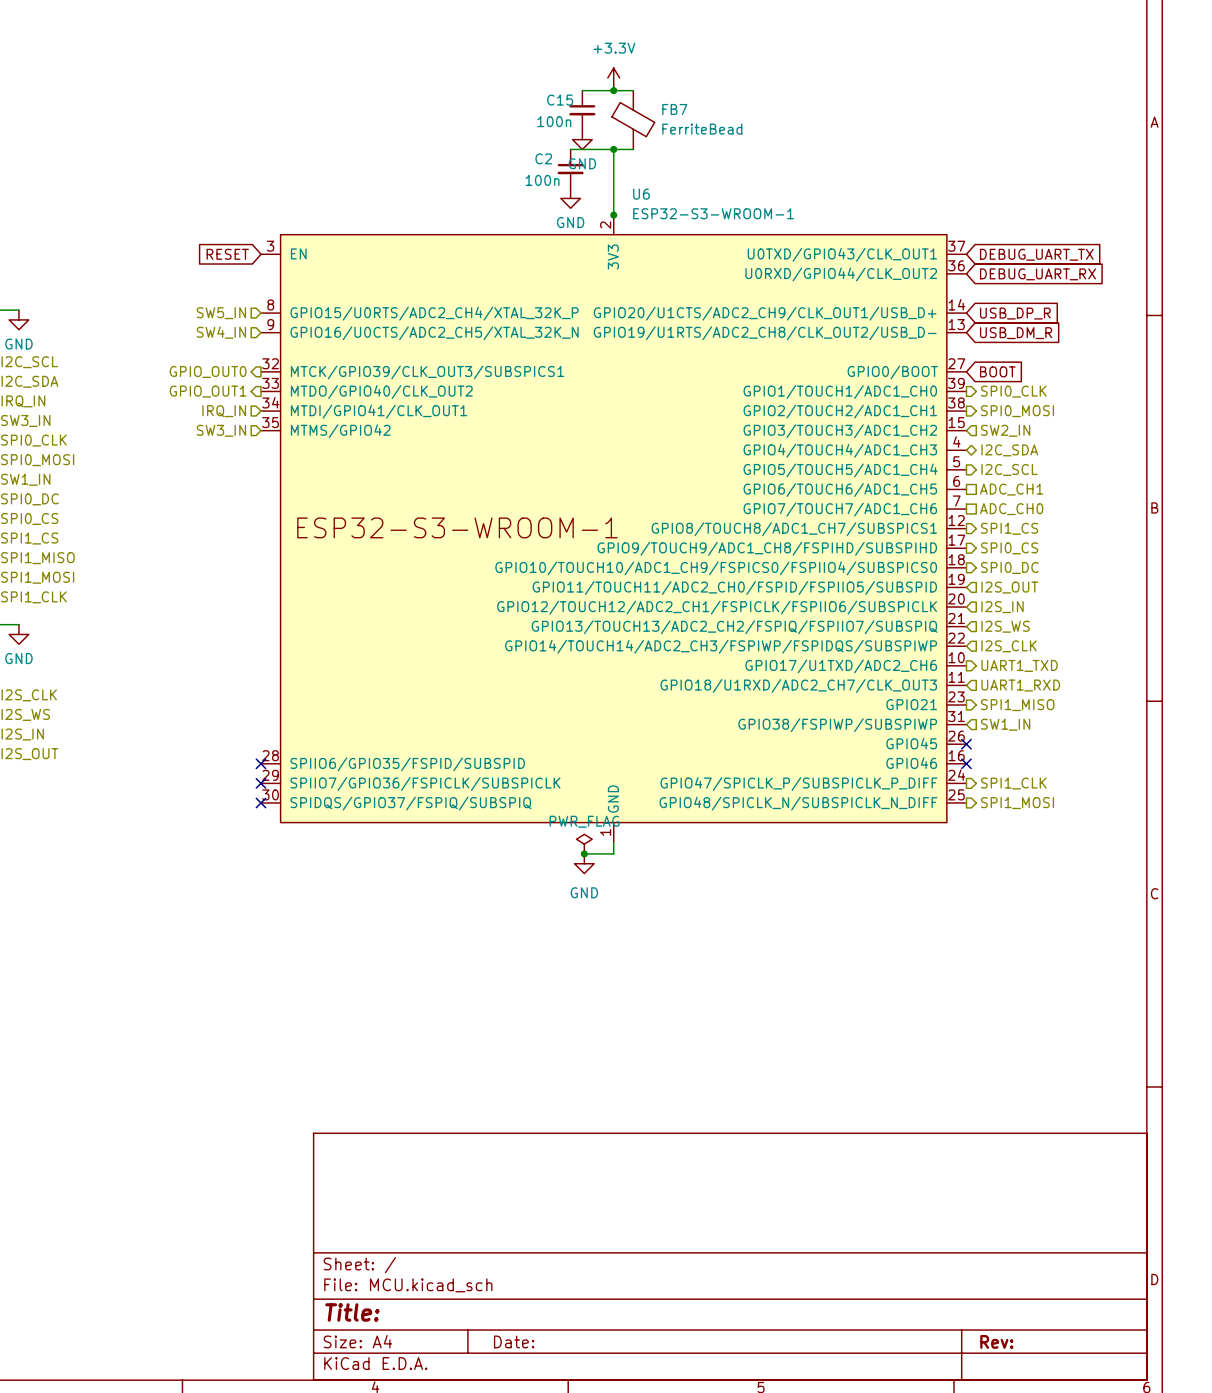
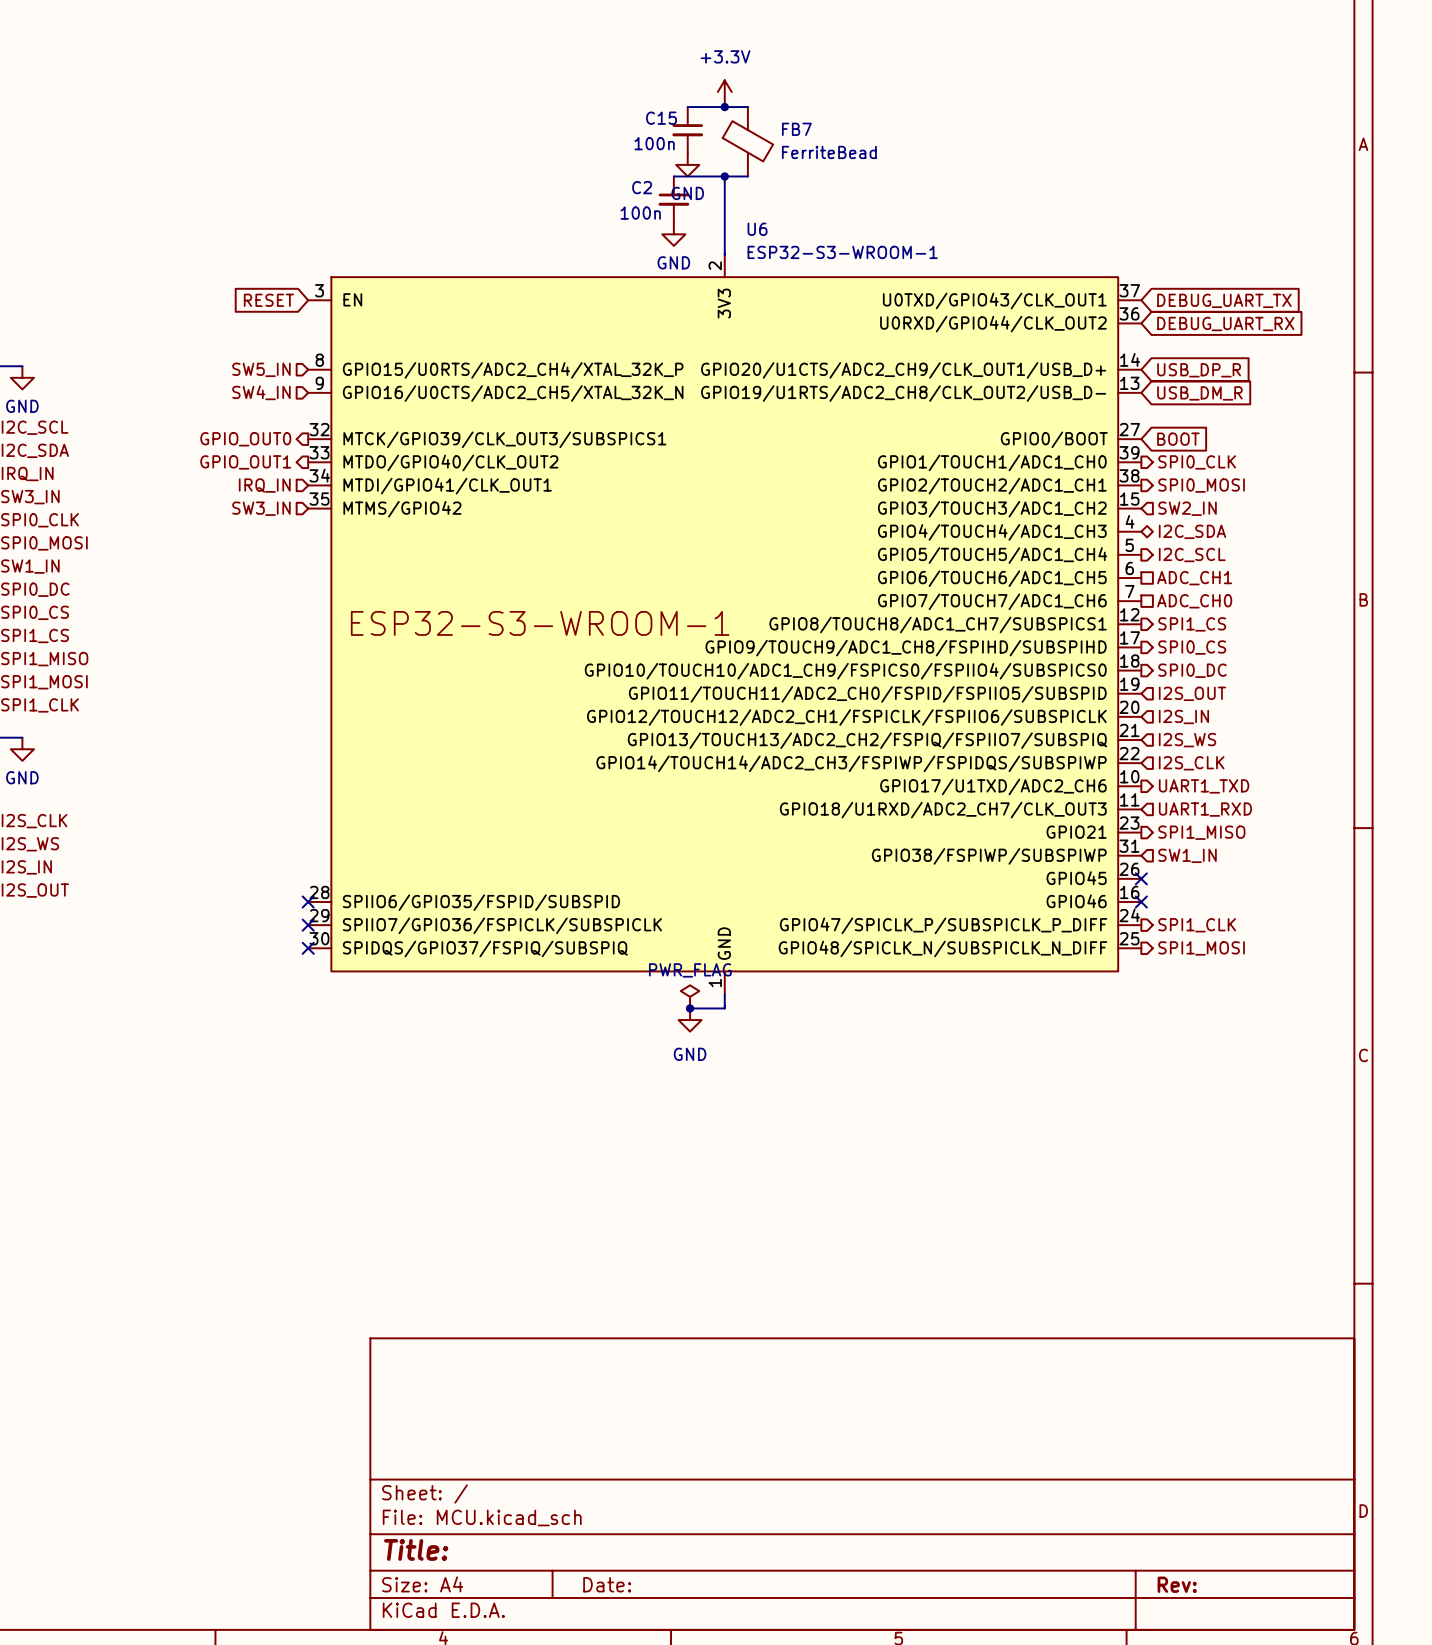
junction: (613, 215) -> none

